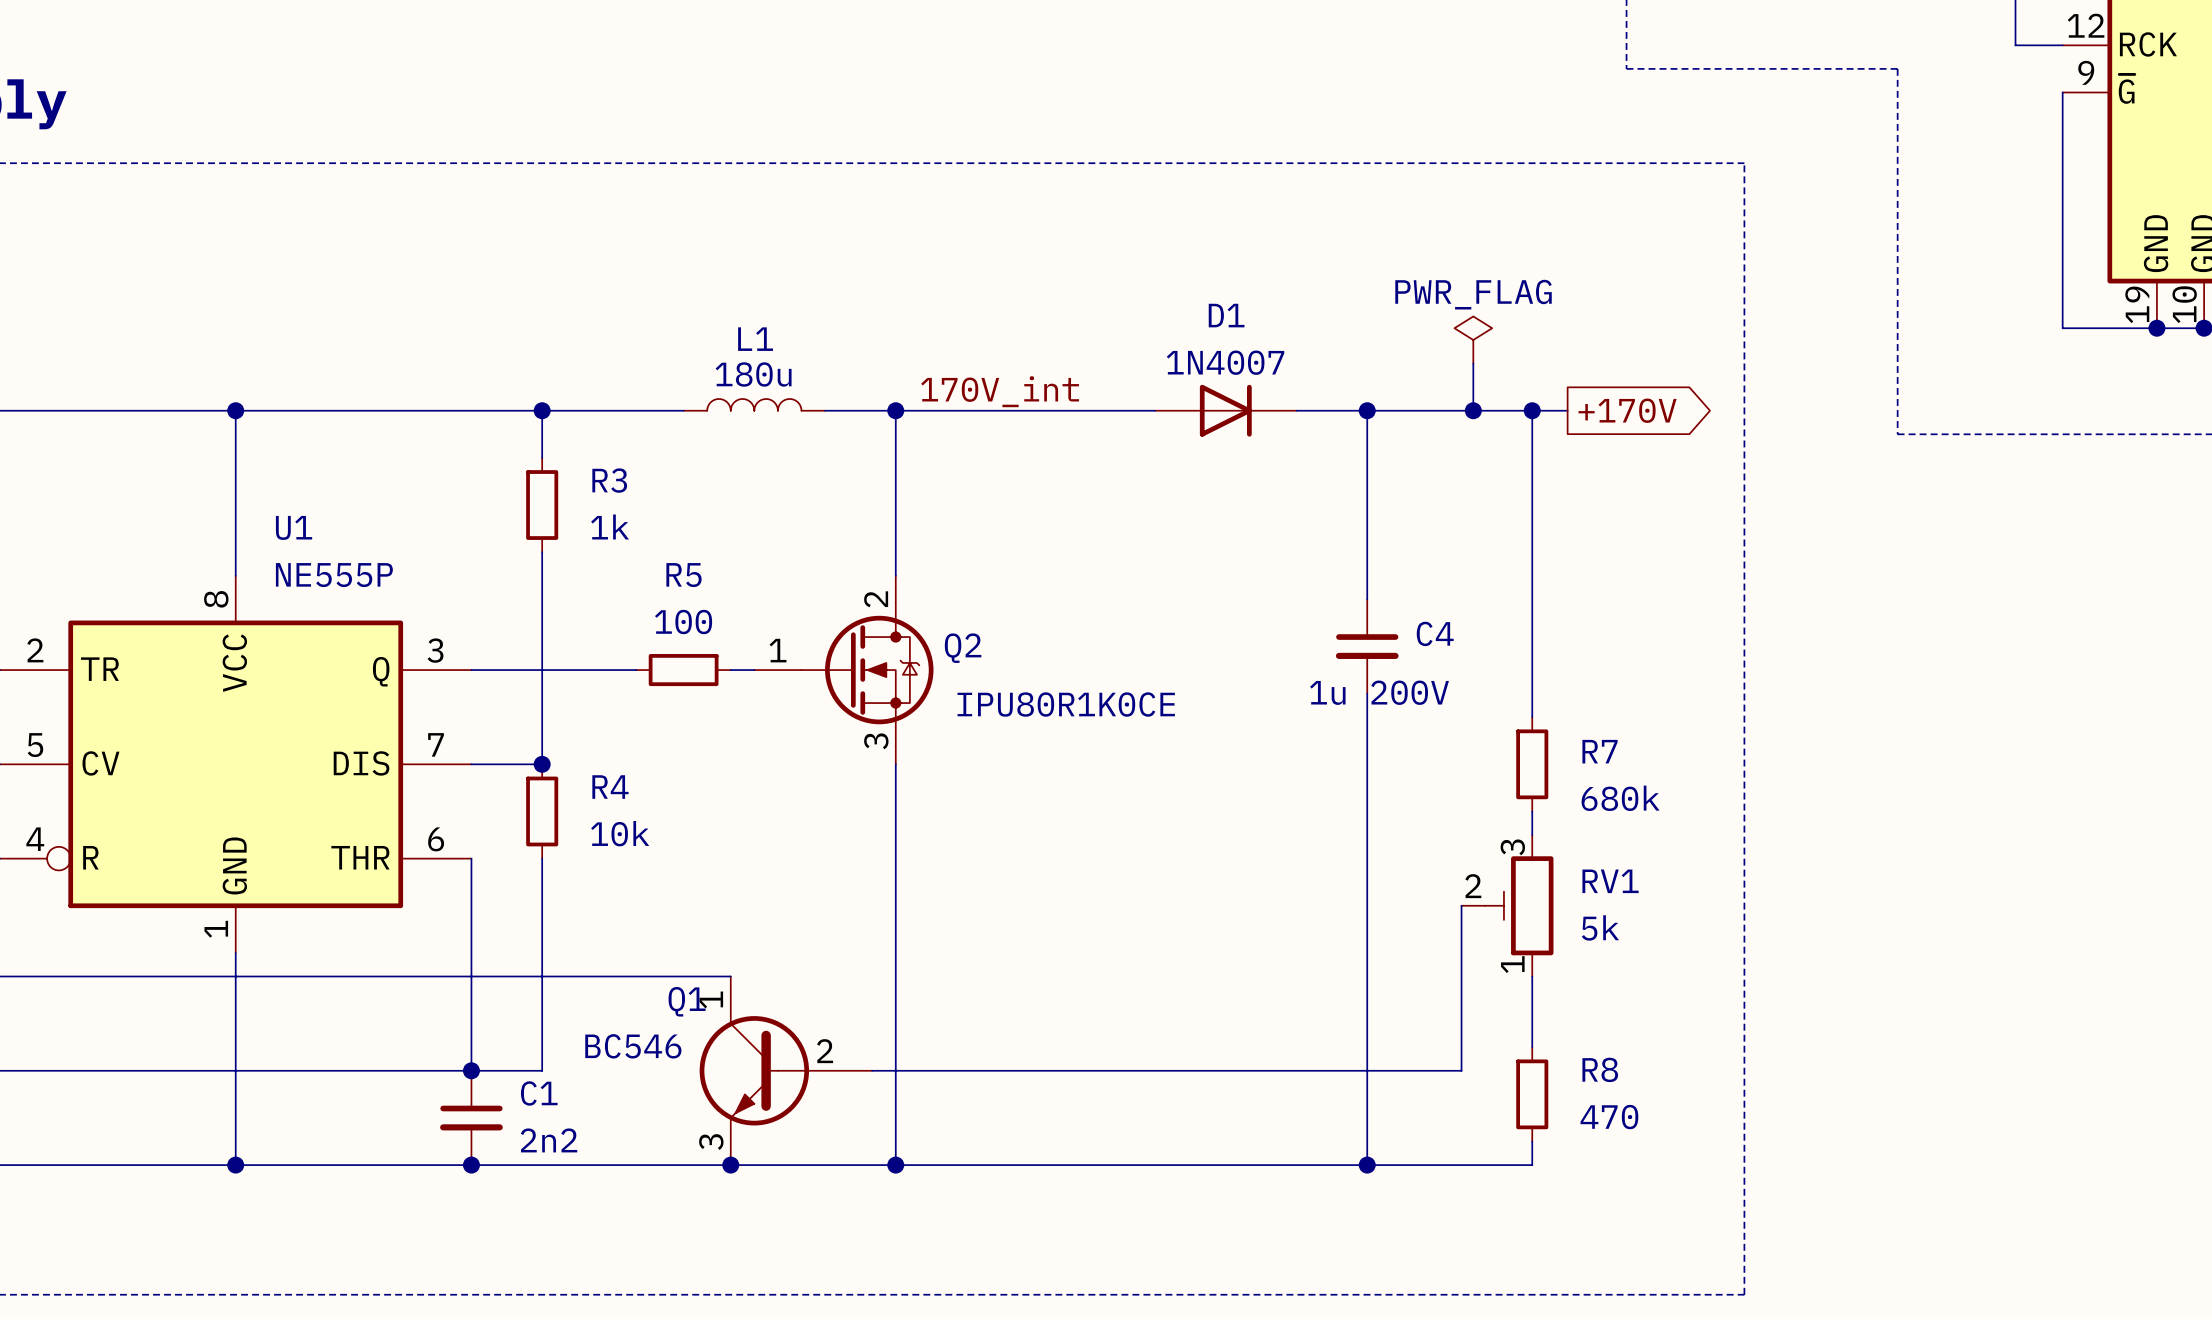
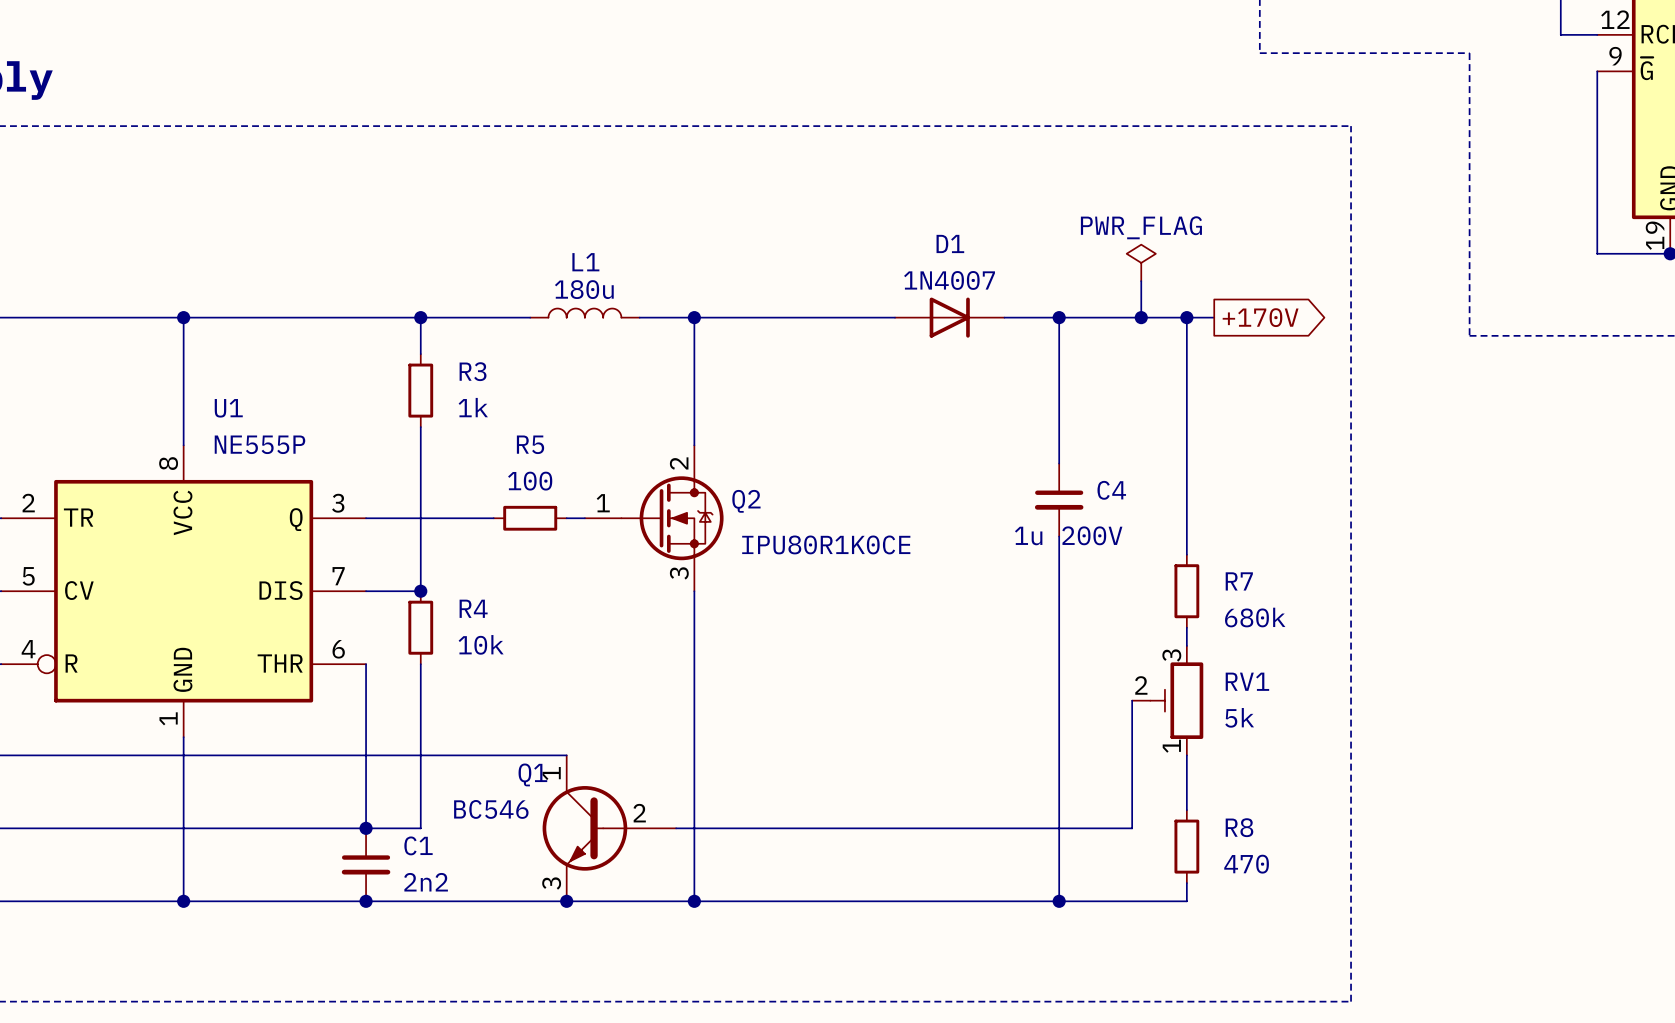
label: 170V_int (1000, 391) -> none

